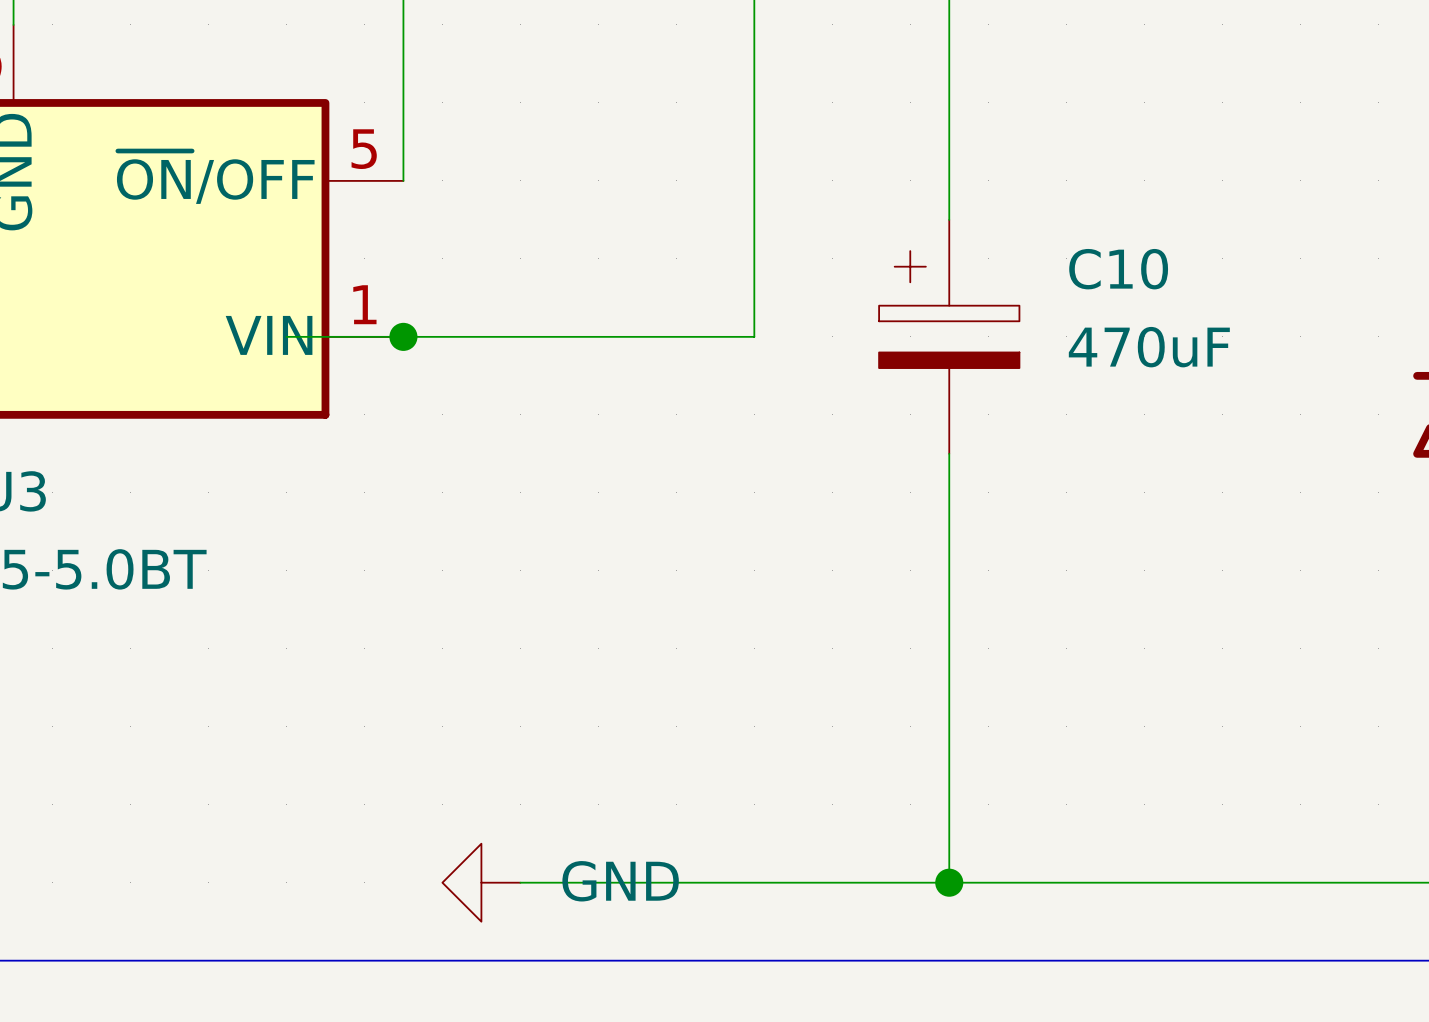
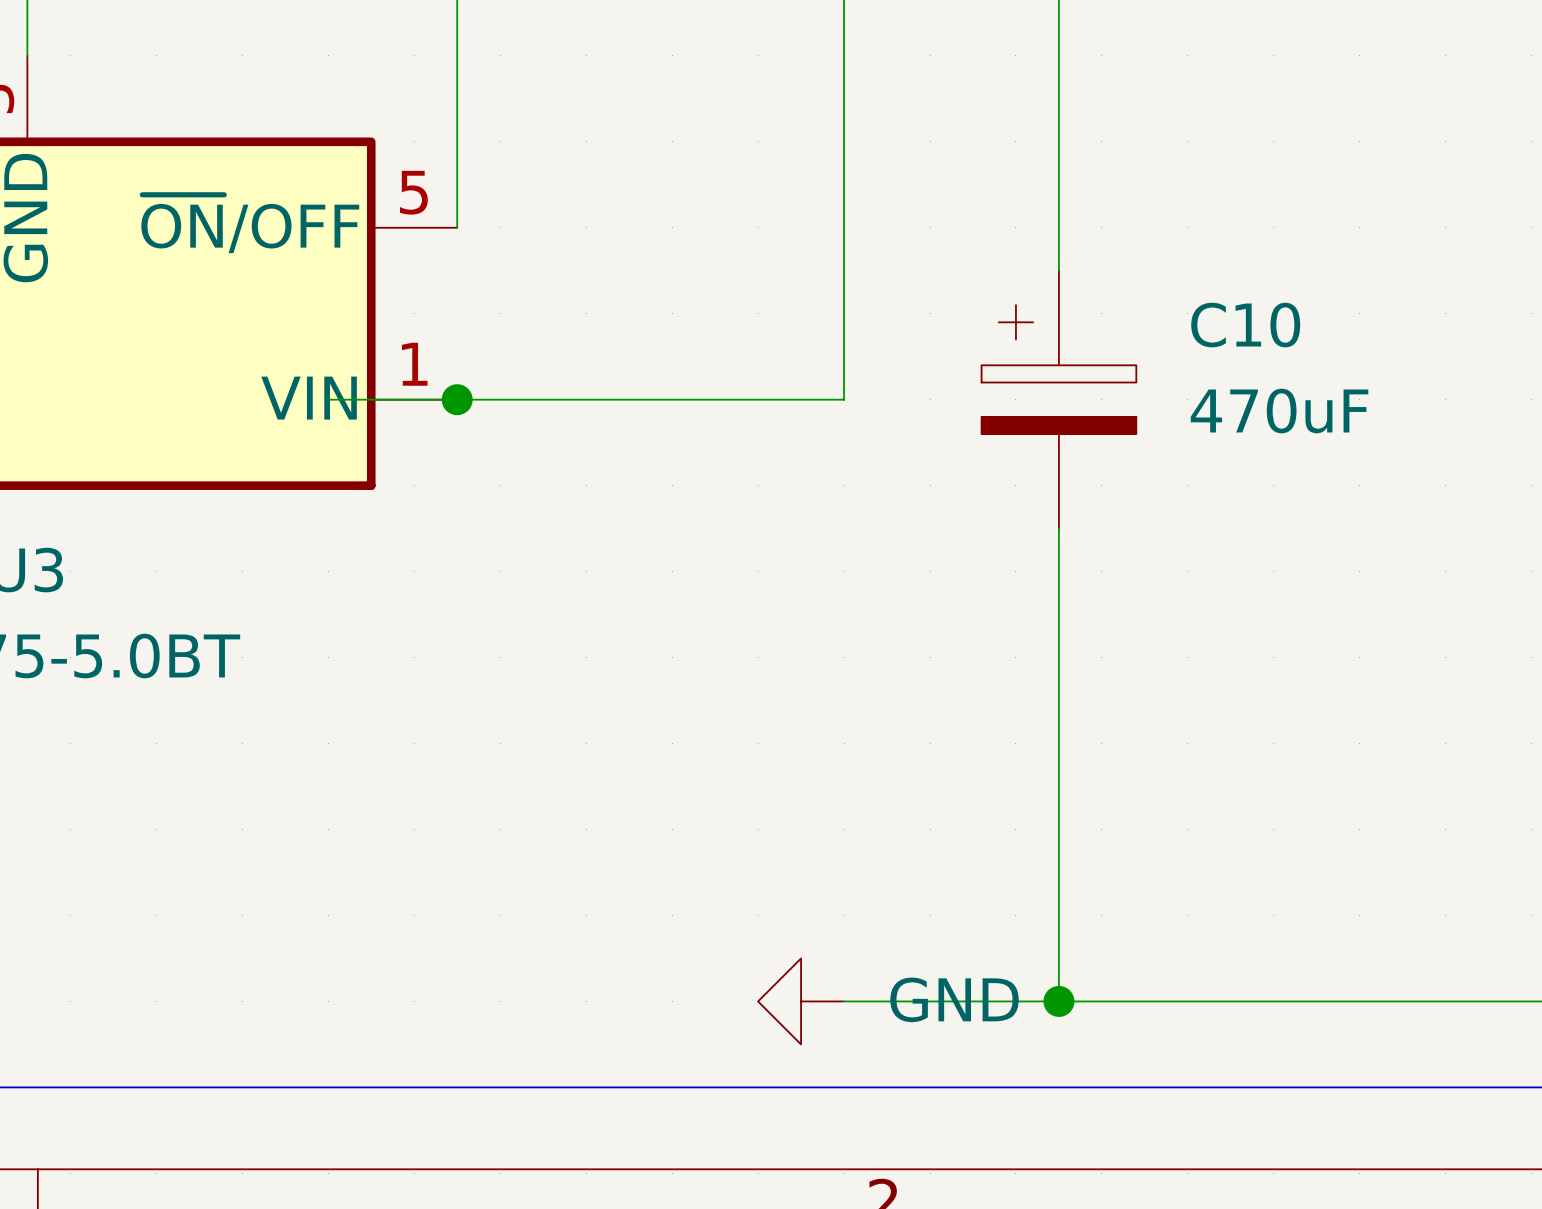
power symbol position: GND (481, 882) -> GND (801, 1001)
wire: (520, 882) (754, 882) -> none

